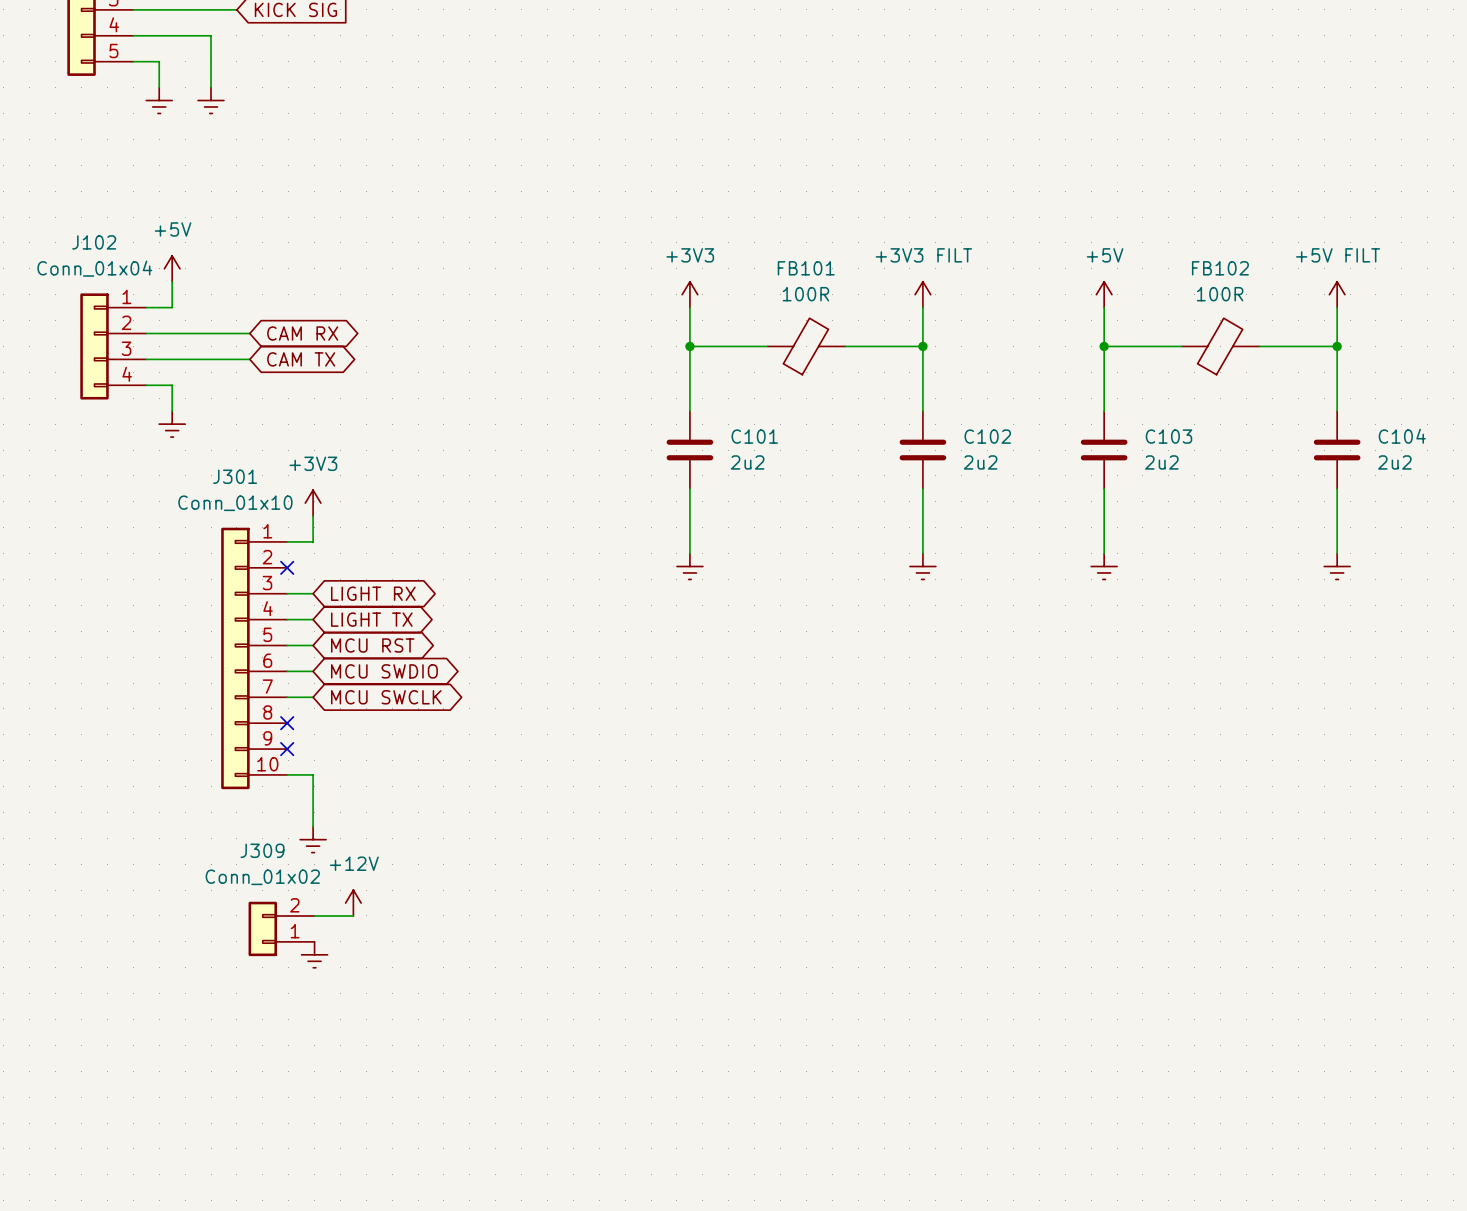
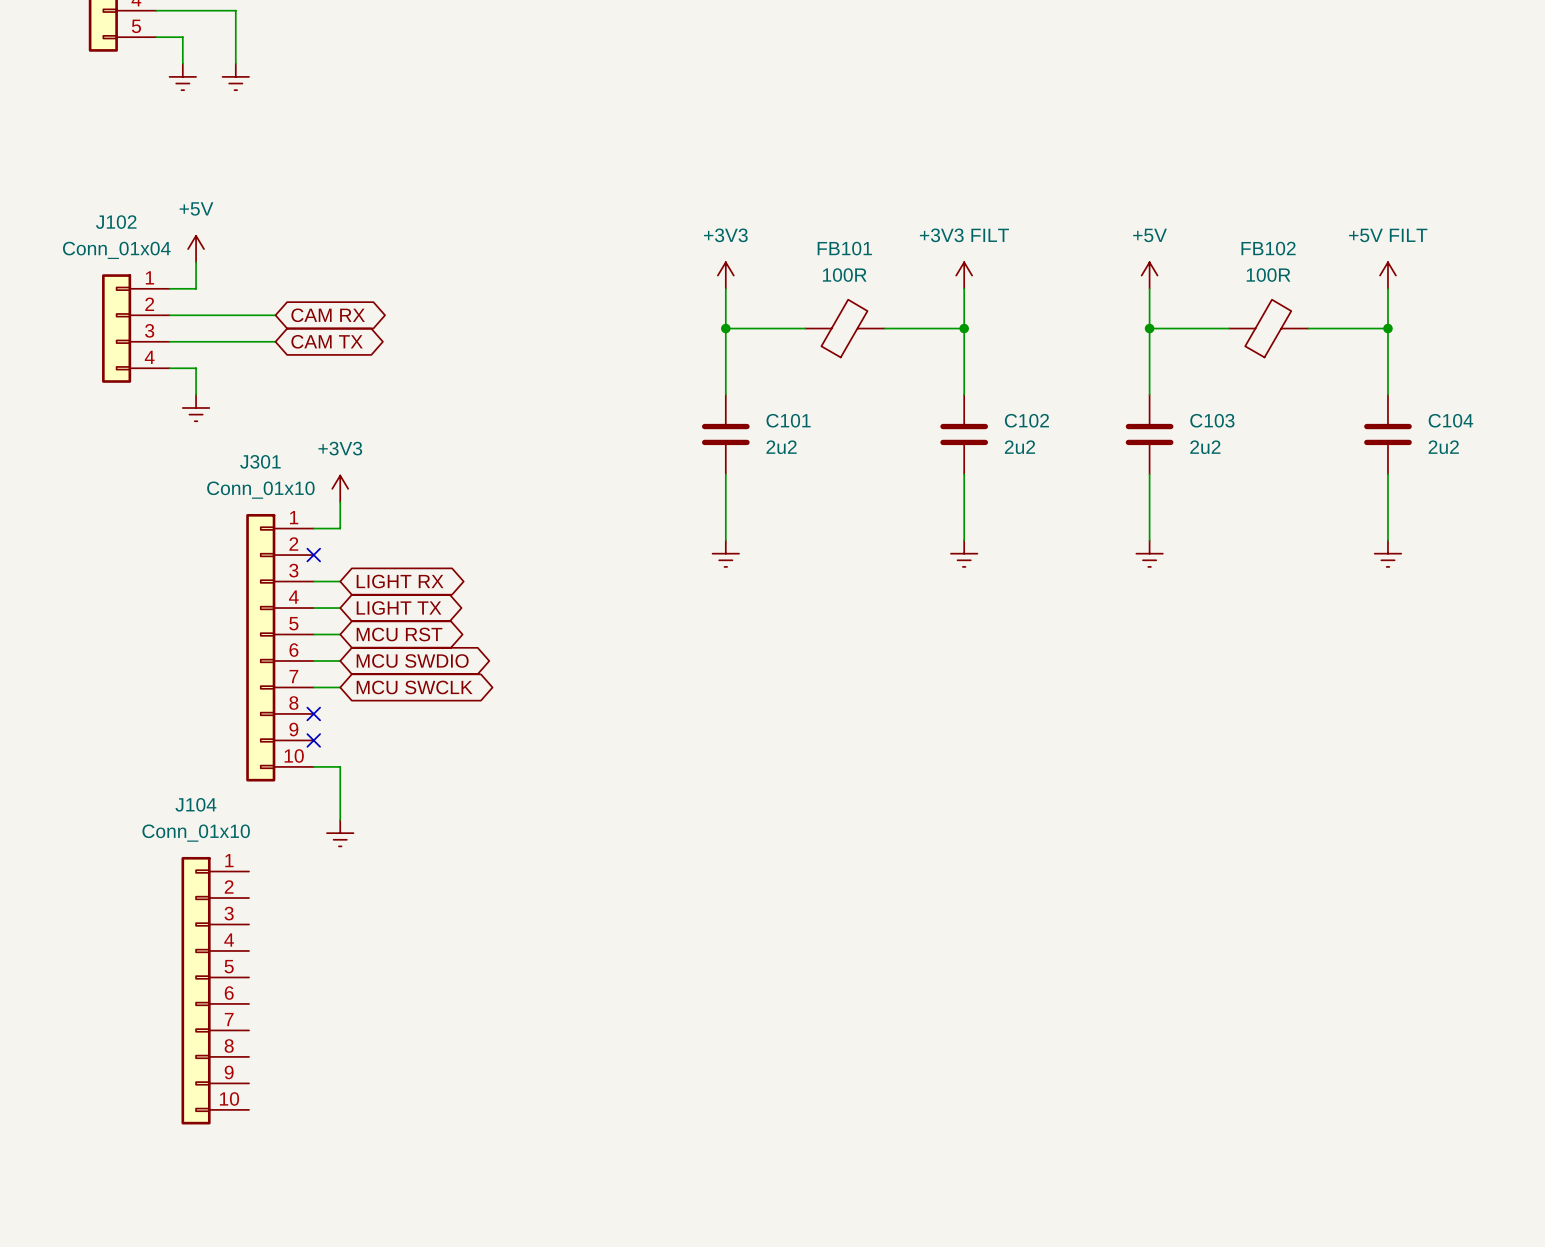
power symbol: +12V (353, 903) -> none
wire: (314, 915) (353, 915) -> none
J309: Conn_01x02 (281, 928) -> none
power symbol: (314, 954) -> none
J104: none -> Conn_01x10 (215, 990)

